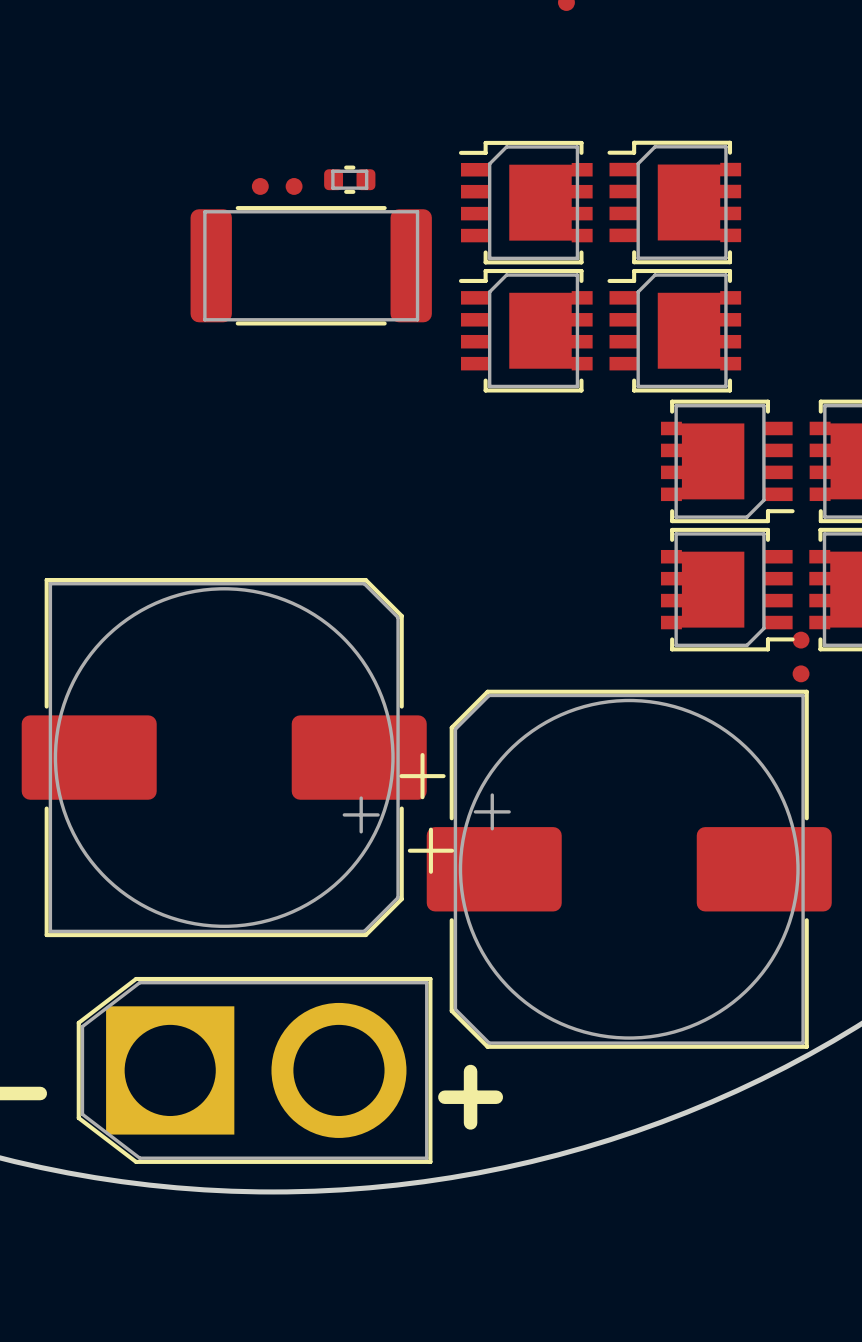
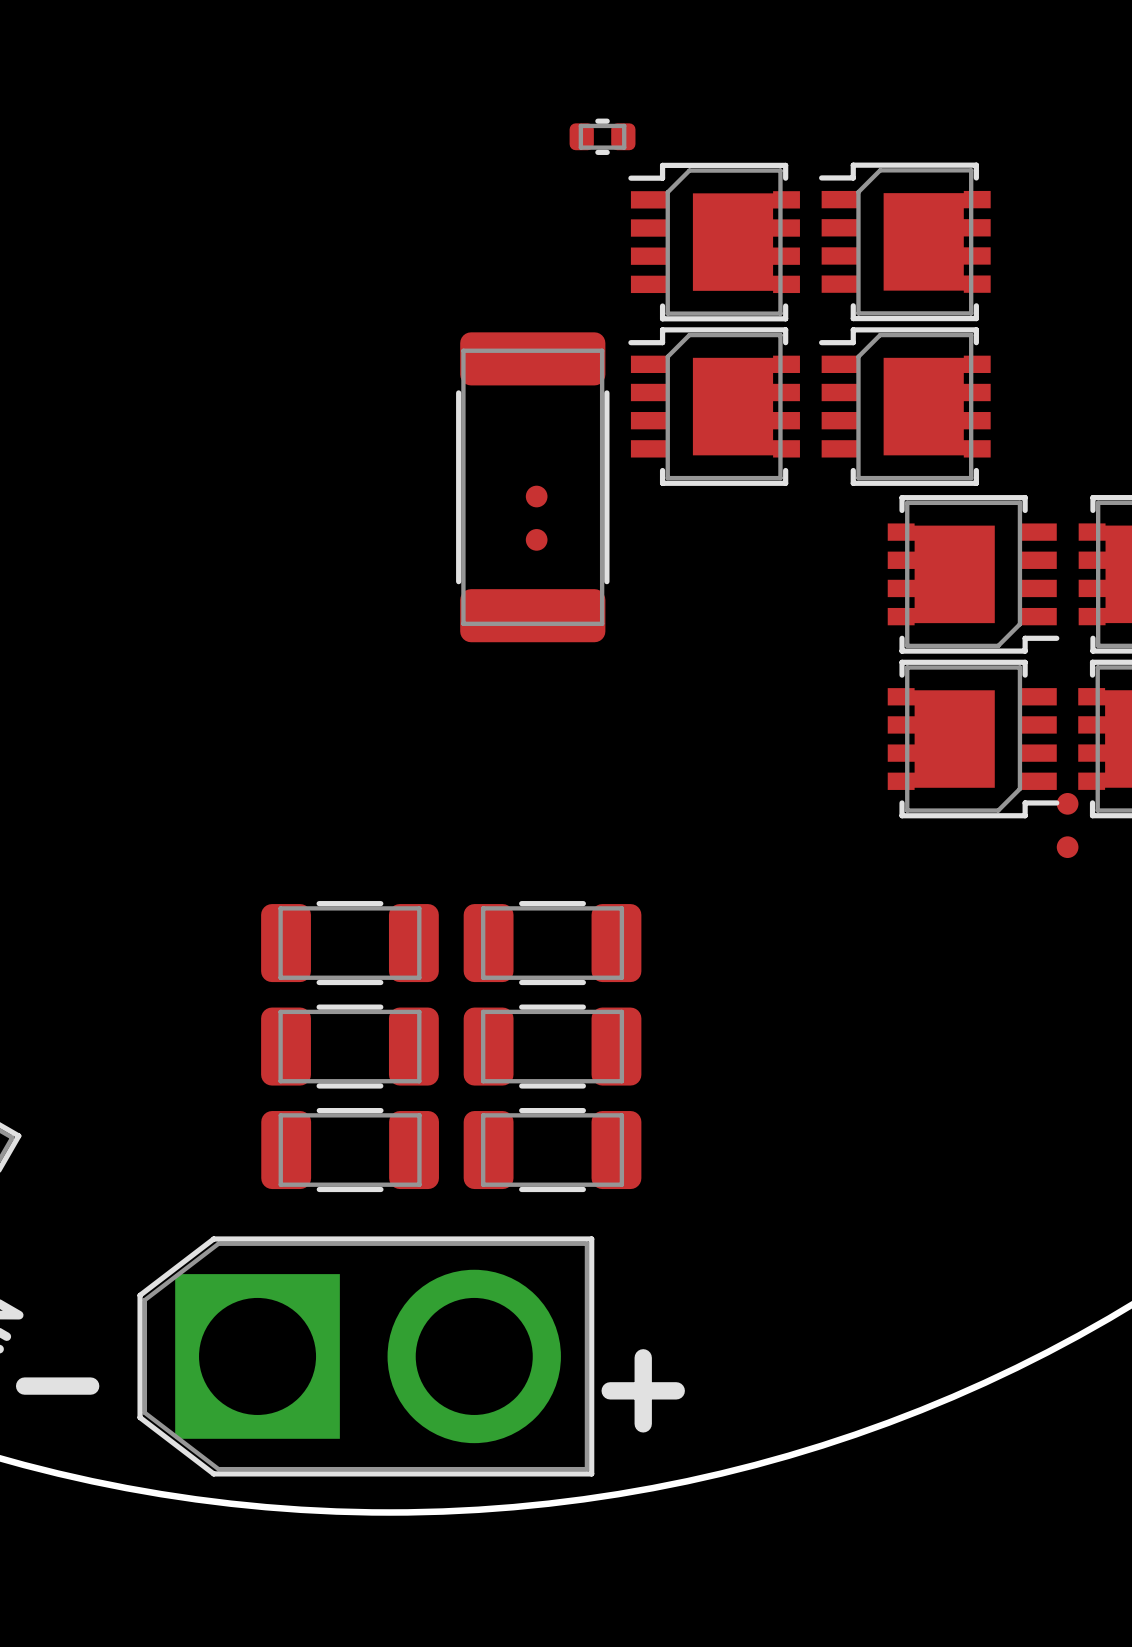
part position: (349, 179) -> (602, 136)
part rotation: 0° (277, 186) -> 90° clockwise (536, 518)
part position: (277, 186) -> (536, 518)
part rotation: 0° (311, 265) -> 90° clockwise (532, 487)
part position: (311, 265) -> (532, 487)
part footprint: [21, 577, 455, 938] -> [261, 901, 439, 986]
part: none -> (552, 943)
part: none -> (349, 1046)
part: none -> (552, 1046)
part: (615, 869) -> none
part: none -> (350, 1150)
part: none -> (552, 1150)

